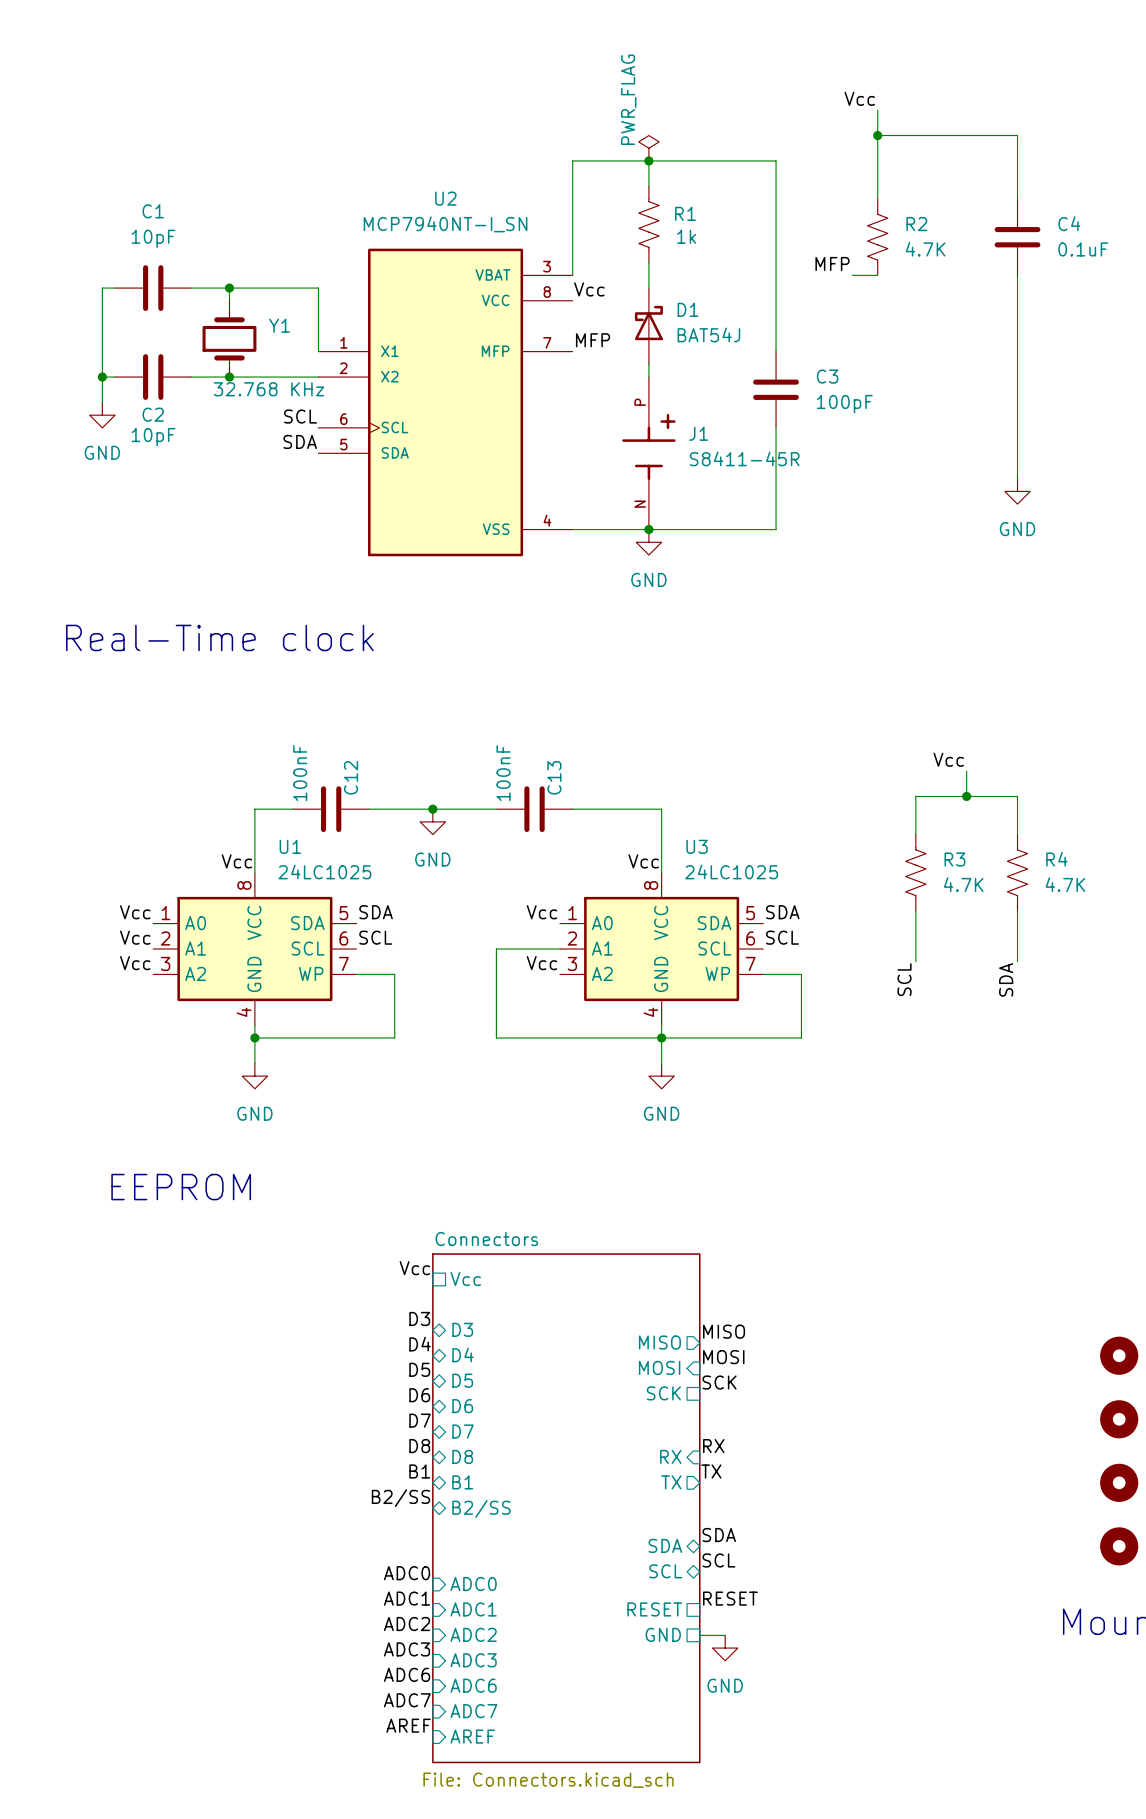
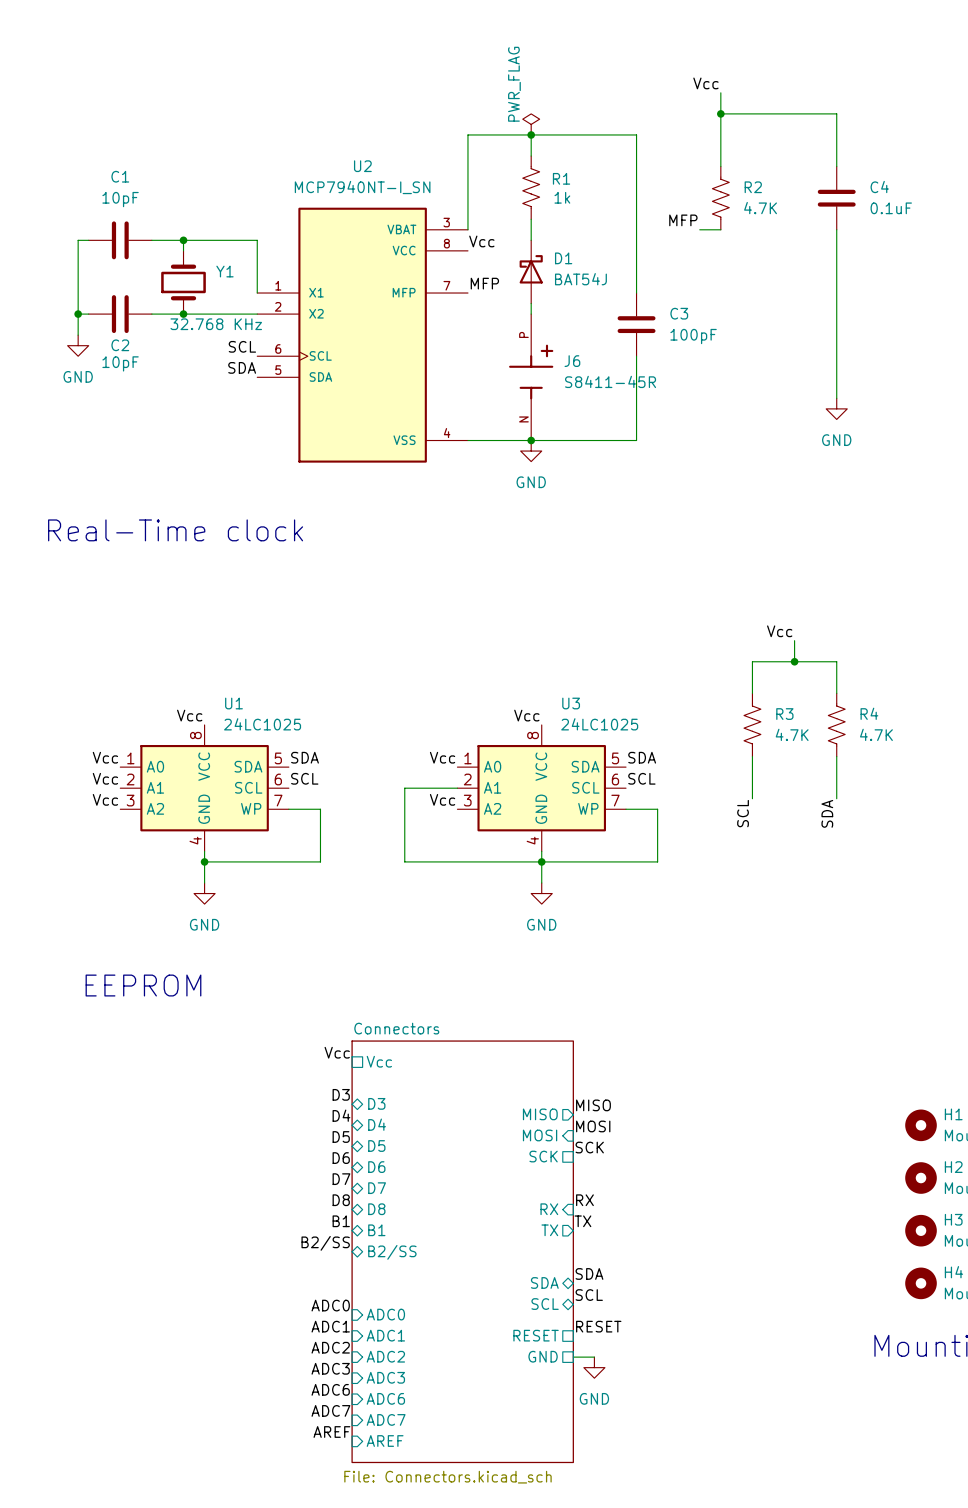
J1 name: J1 (698, 433) -> J6 (572, 361)
wire: (293, 809) (254, 809) (254, 872) -> none
C12: 100nF (331, 809) -> none
wire: (369, 809) (496, 809) -> none
junction: (432, 809) -> none
C13: 100nF (534, 809) -> none
wire: (572, 809) (661, 809) (661, 872) -> none
power symbol: GND (432, 821) -> none

